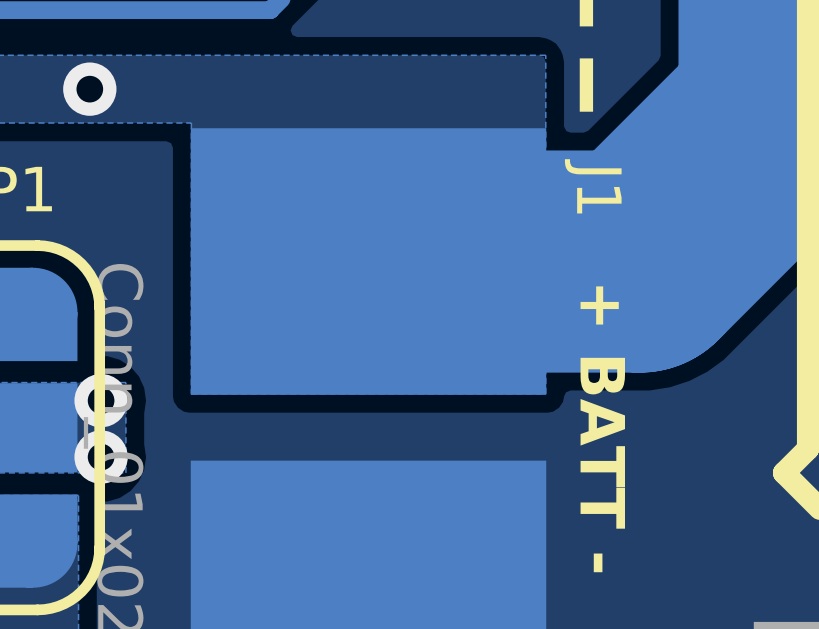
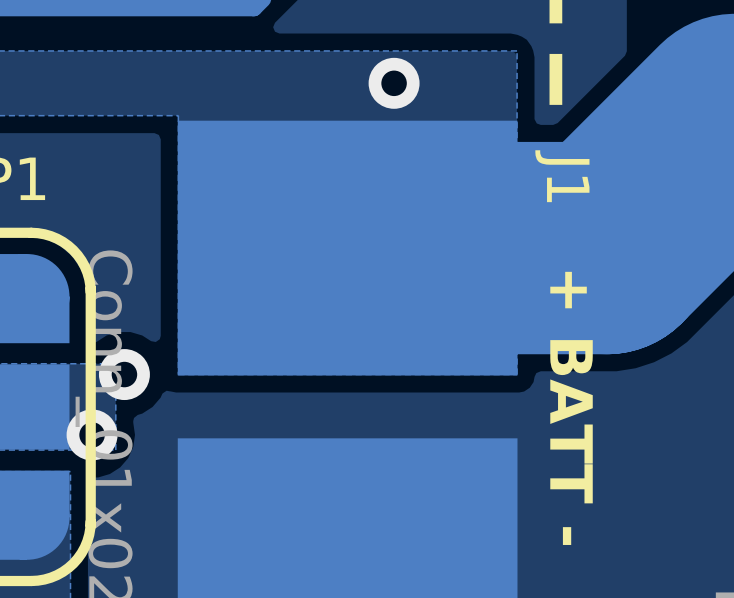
via: (89, 89) -> none
via: none -> (394, 83)
via position: (101, 400) -> (124, 374)

